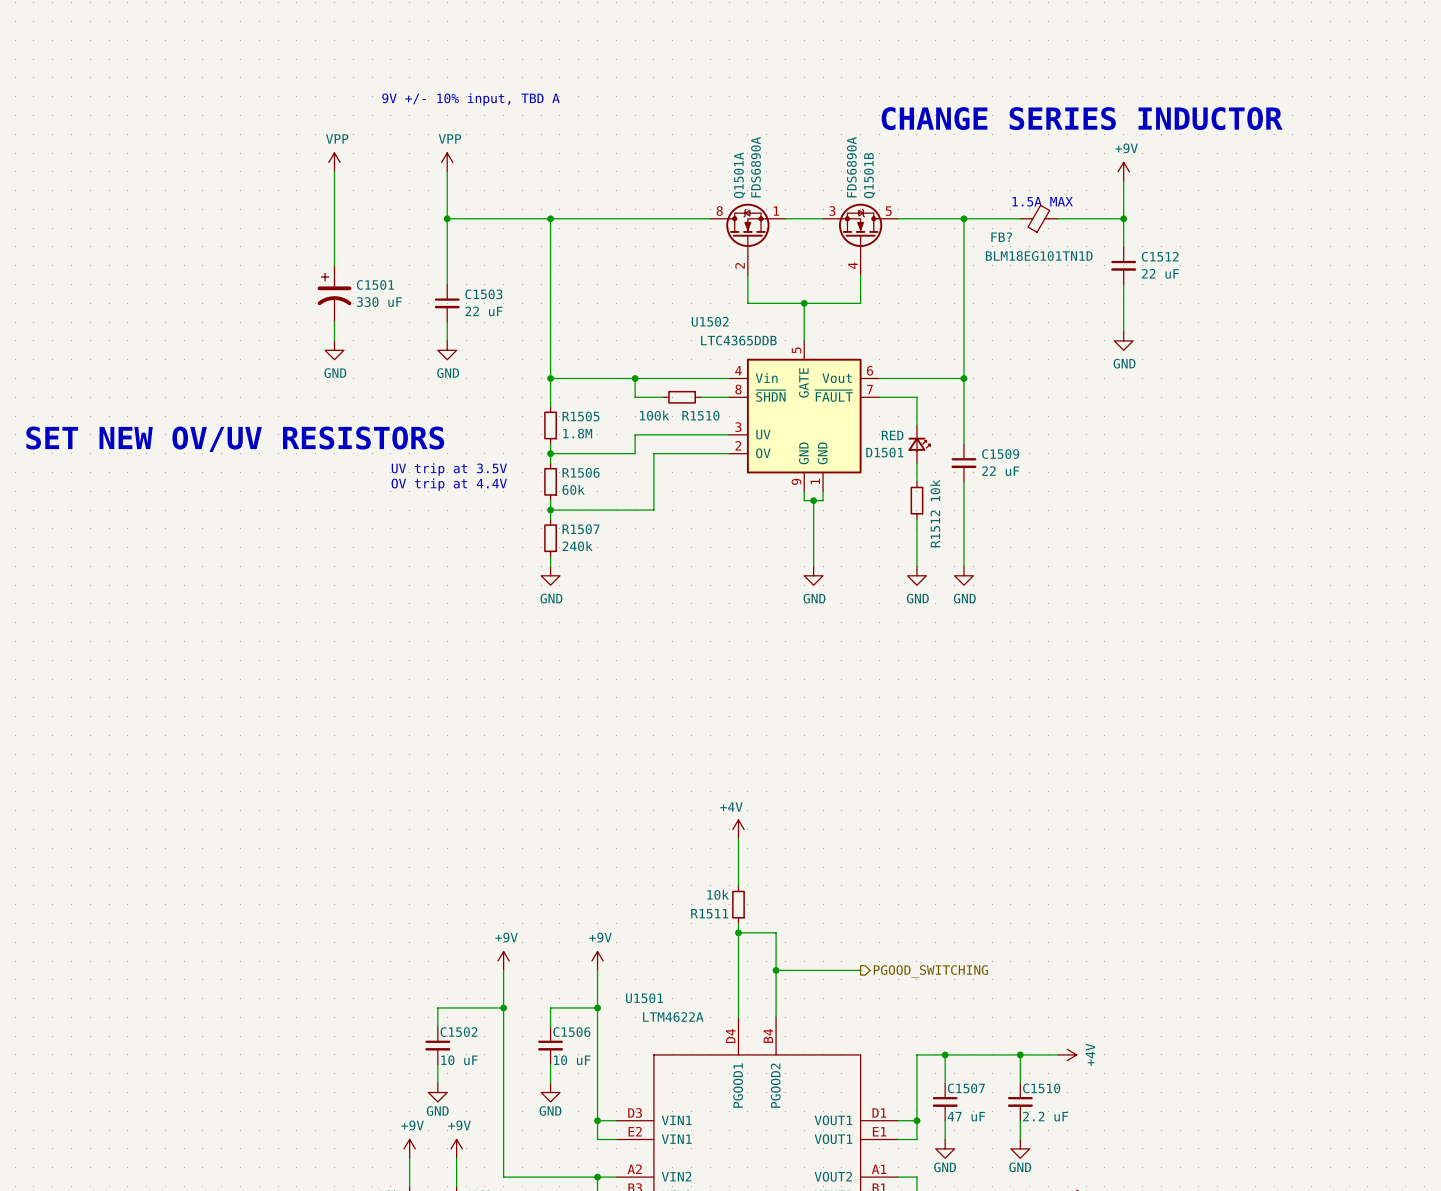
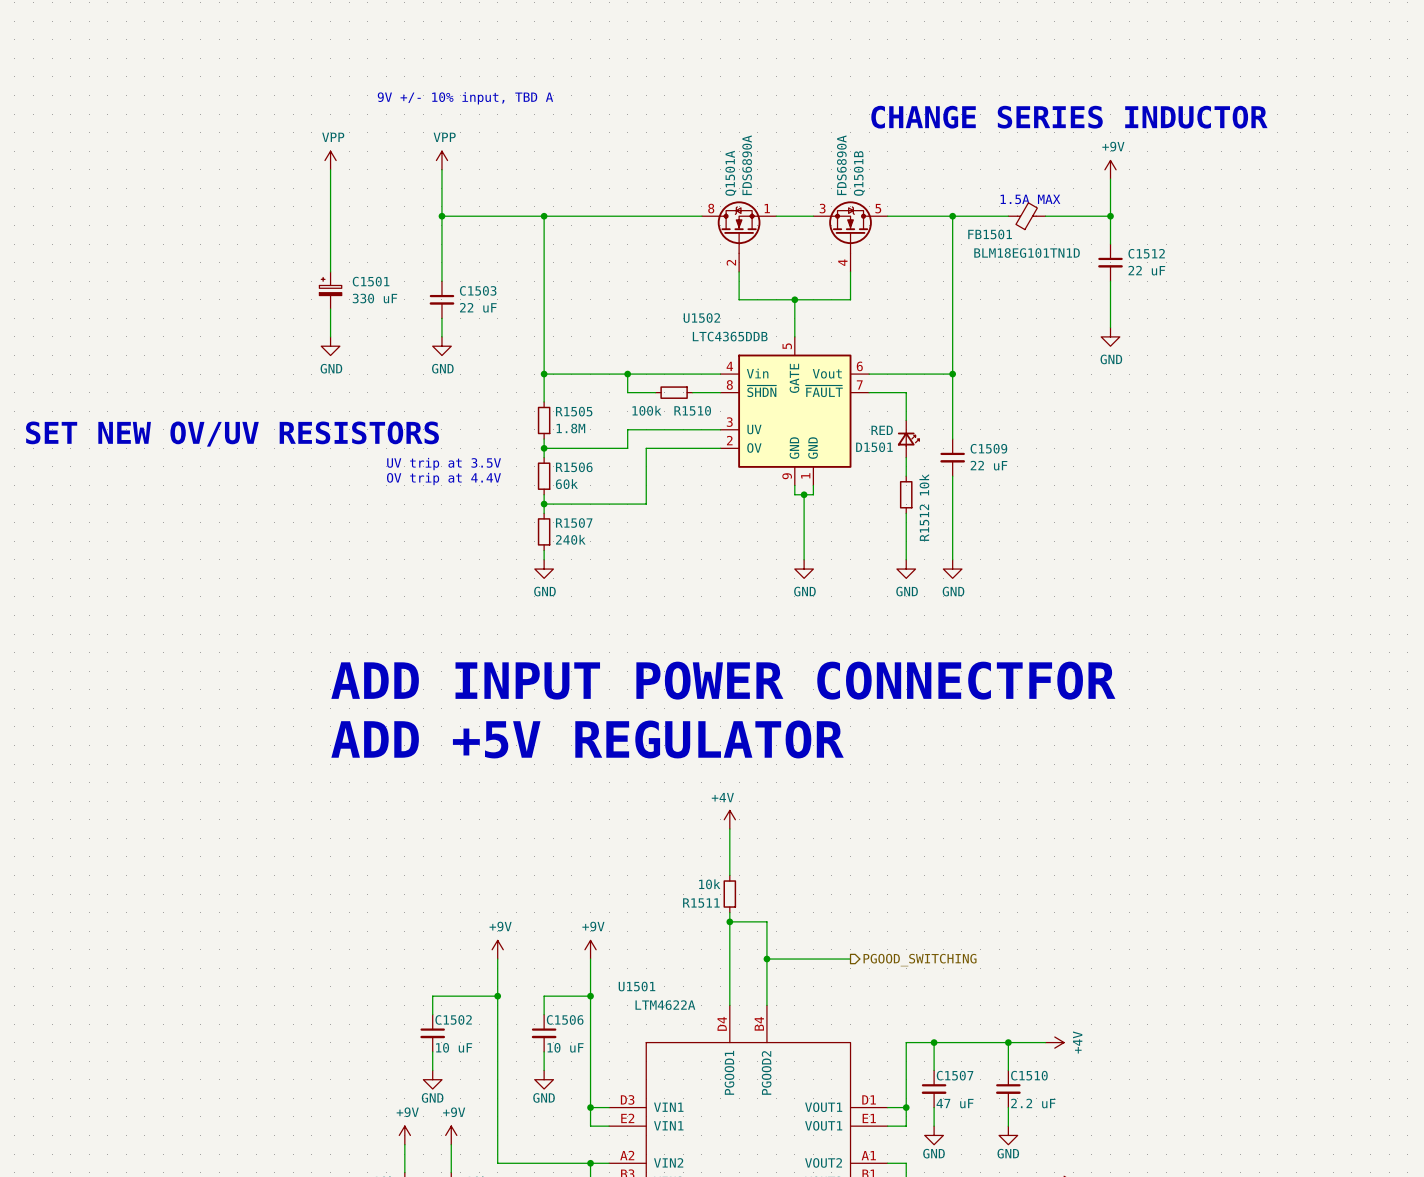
FB? name: FB? (1001, 237) -> FB1501 (990, 234)
C1501 symbol: [317, 265, 352, 323] -> [319, 271, 342, 310]
text: none -> ADD INPUT POWER CONNECTFOR (723, 680)
text: none -> ADD +5V REGULATOR (587, 739)

